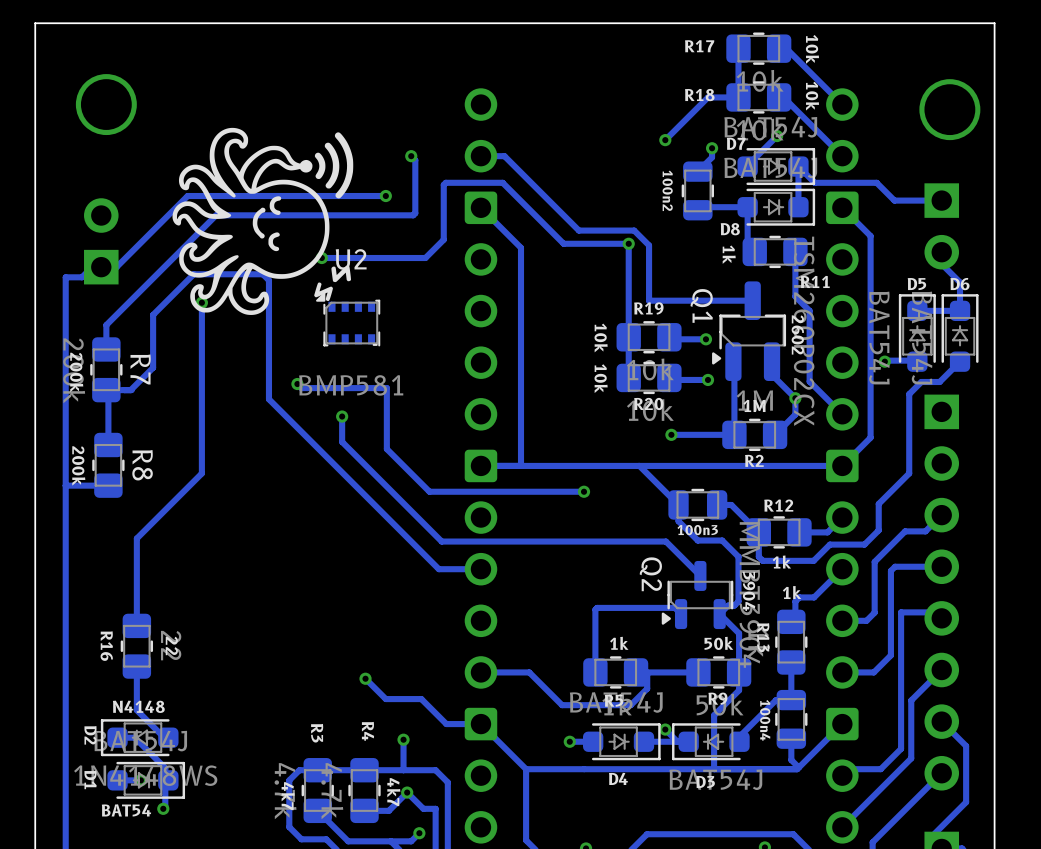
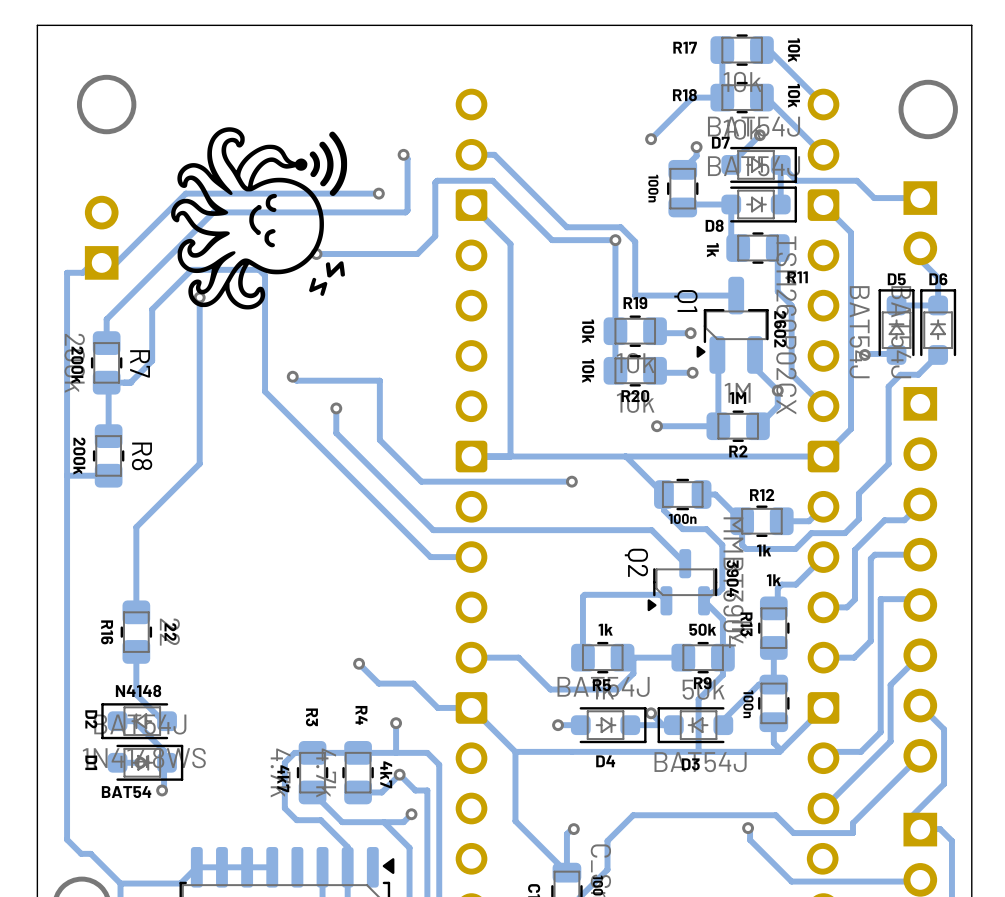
100n2 name: 100n2 (667, 190) -> 100n (653, 188)
U2: BMP581 (348, 319) -> none
100n3 name: 100n3 (697, 530) -> 100n (682, 518)
100n4 name: 100n4 (765, 720) -> 100n (748, 704)

